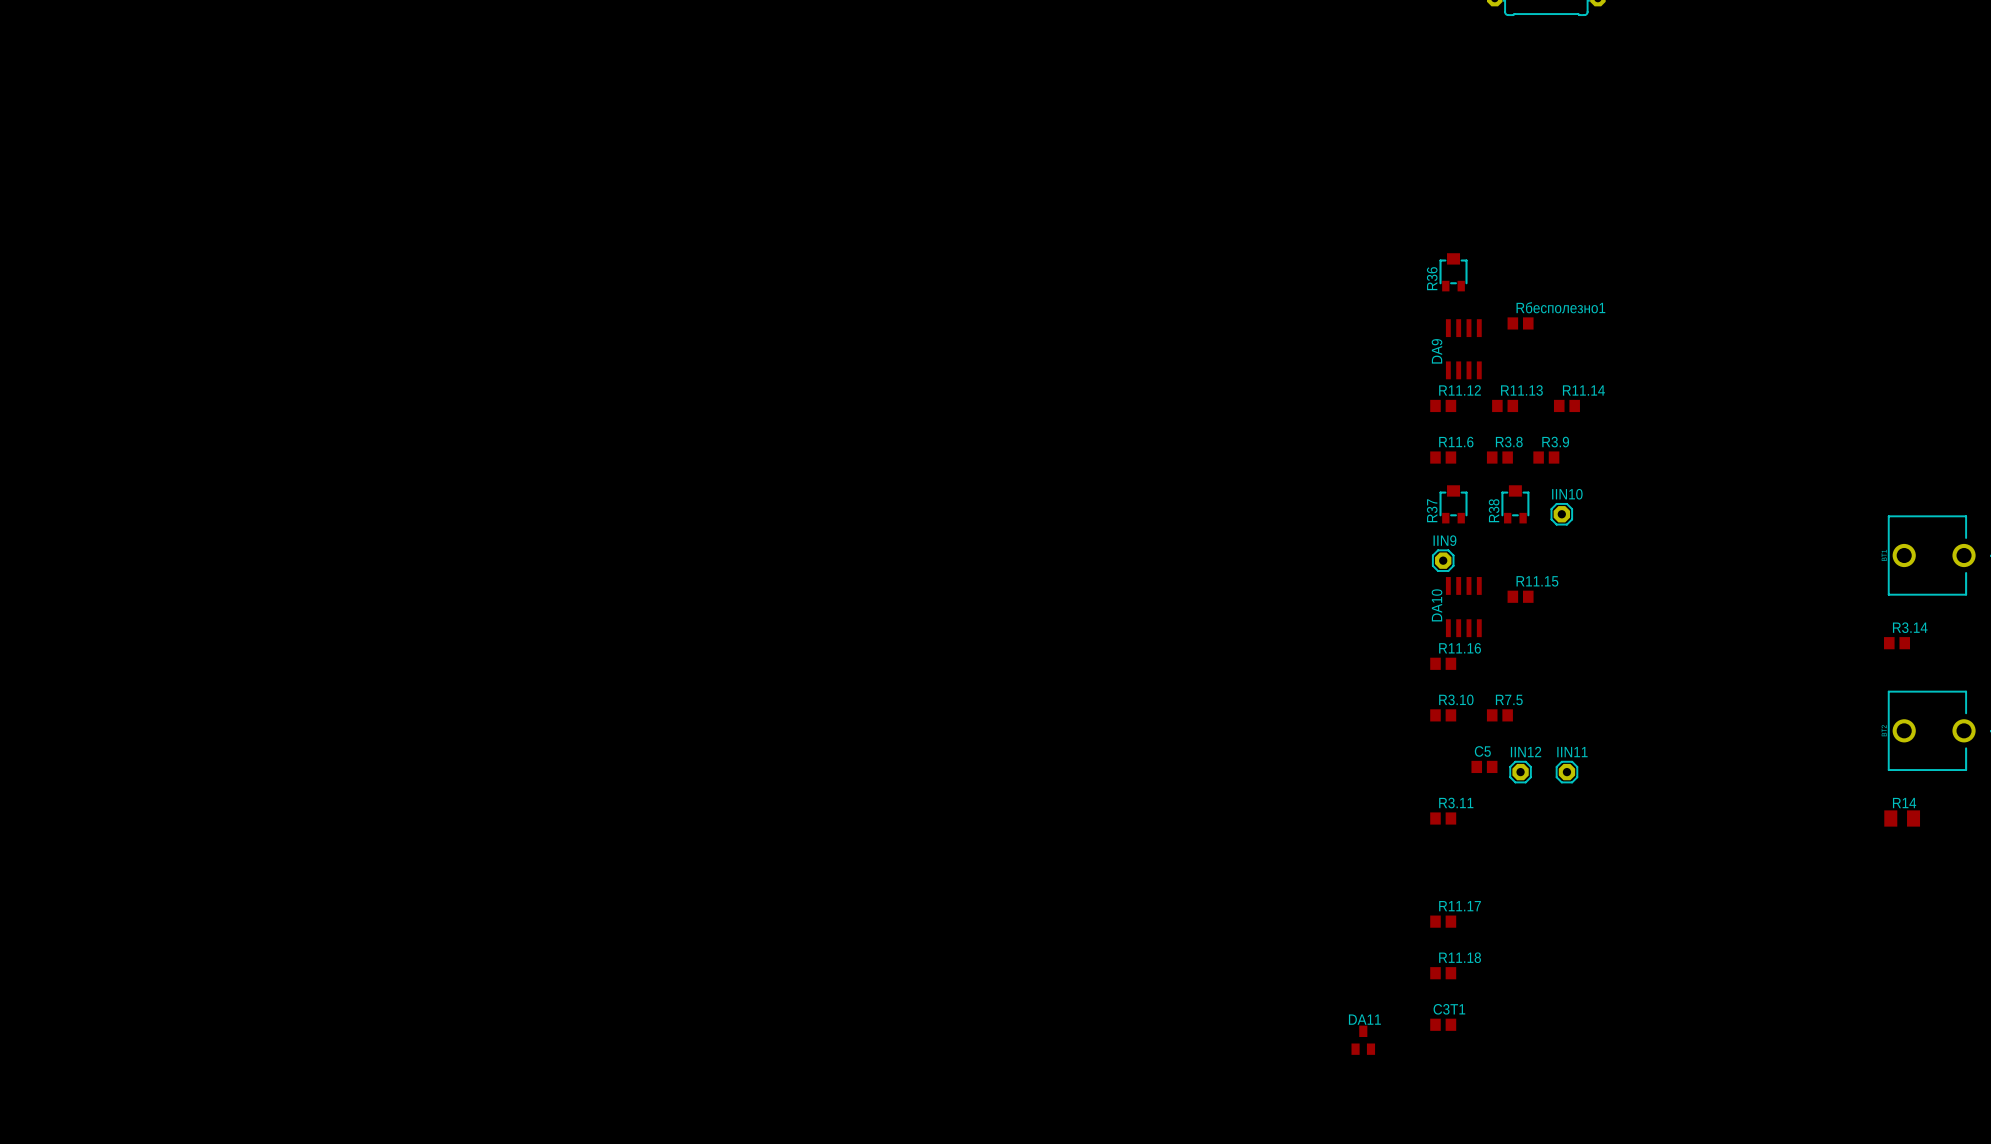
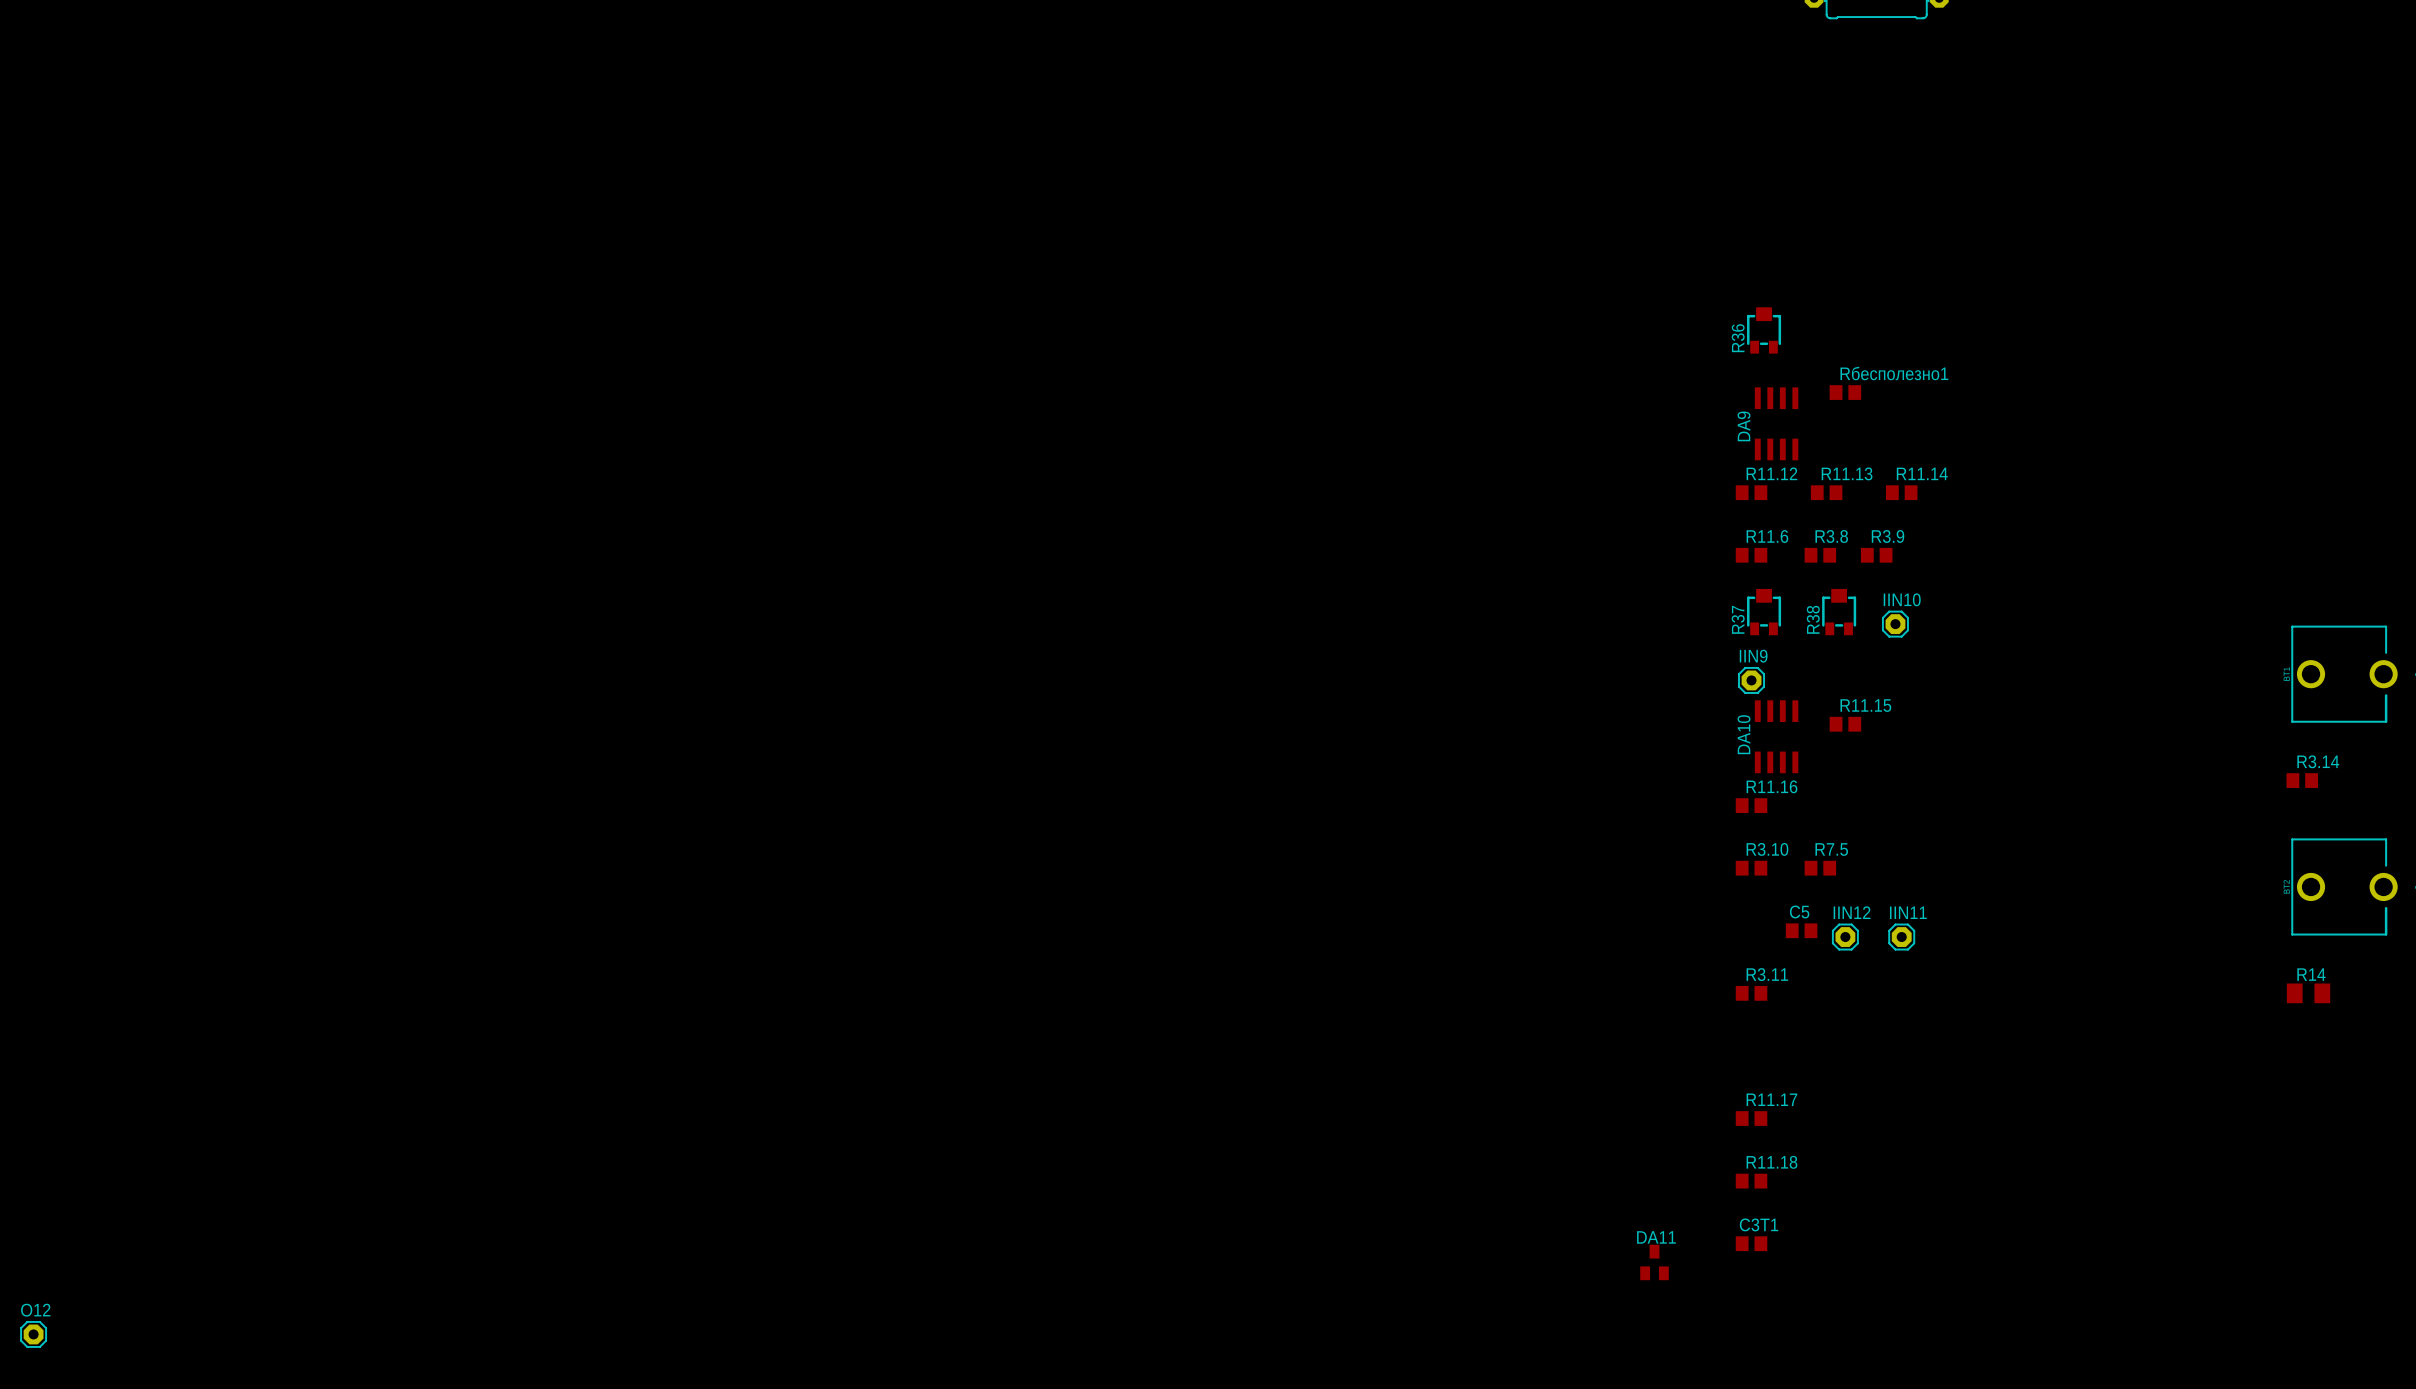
O12: none -> (33, 1334)

